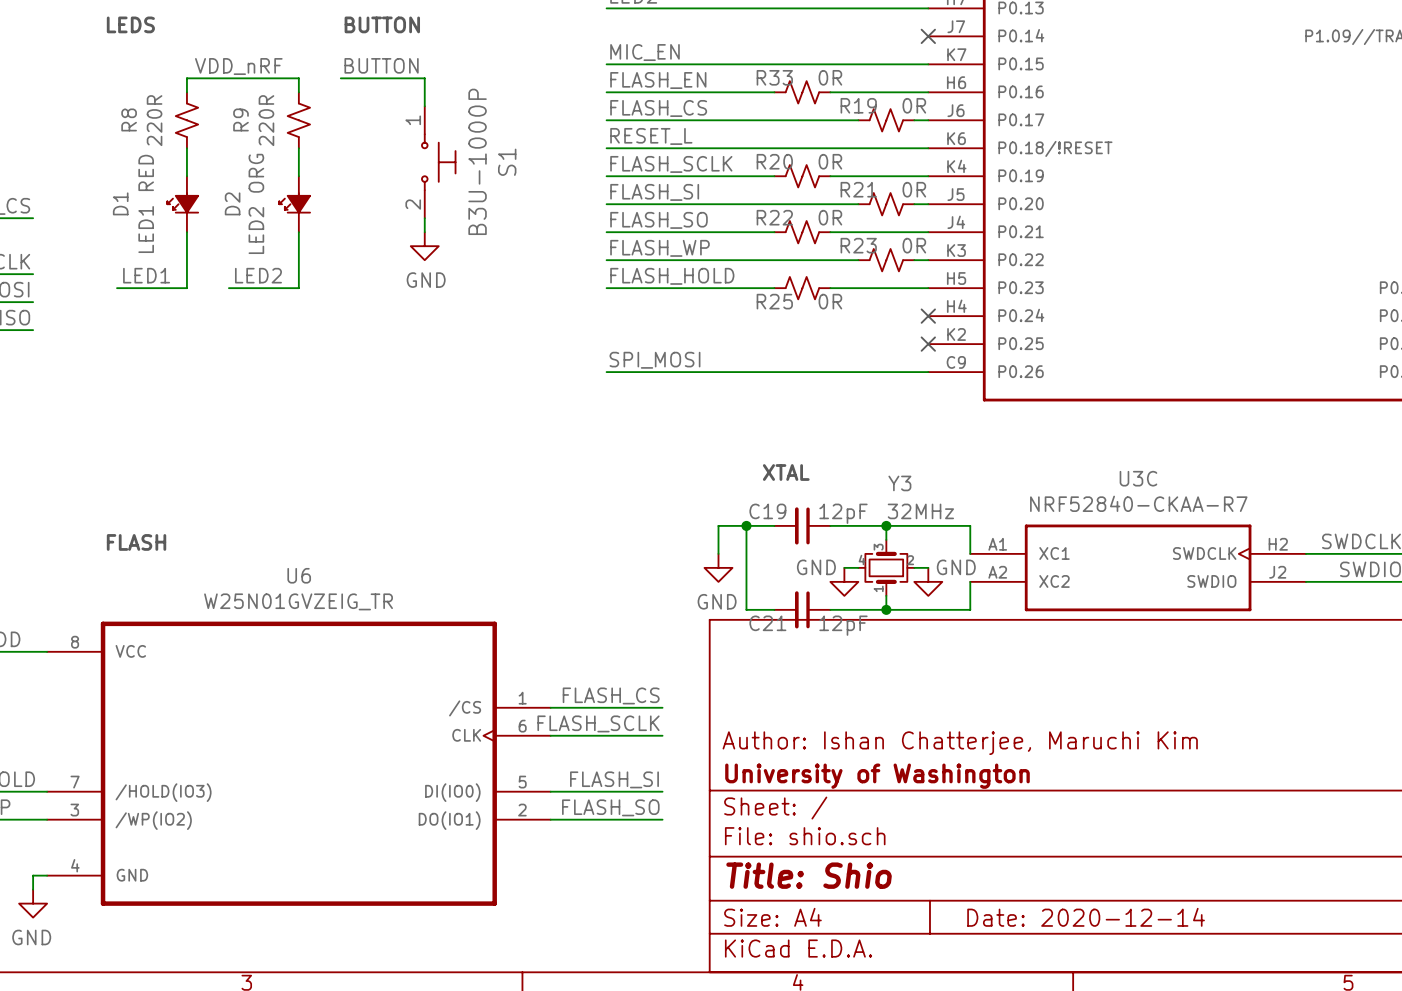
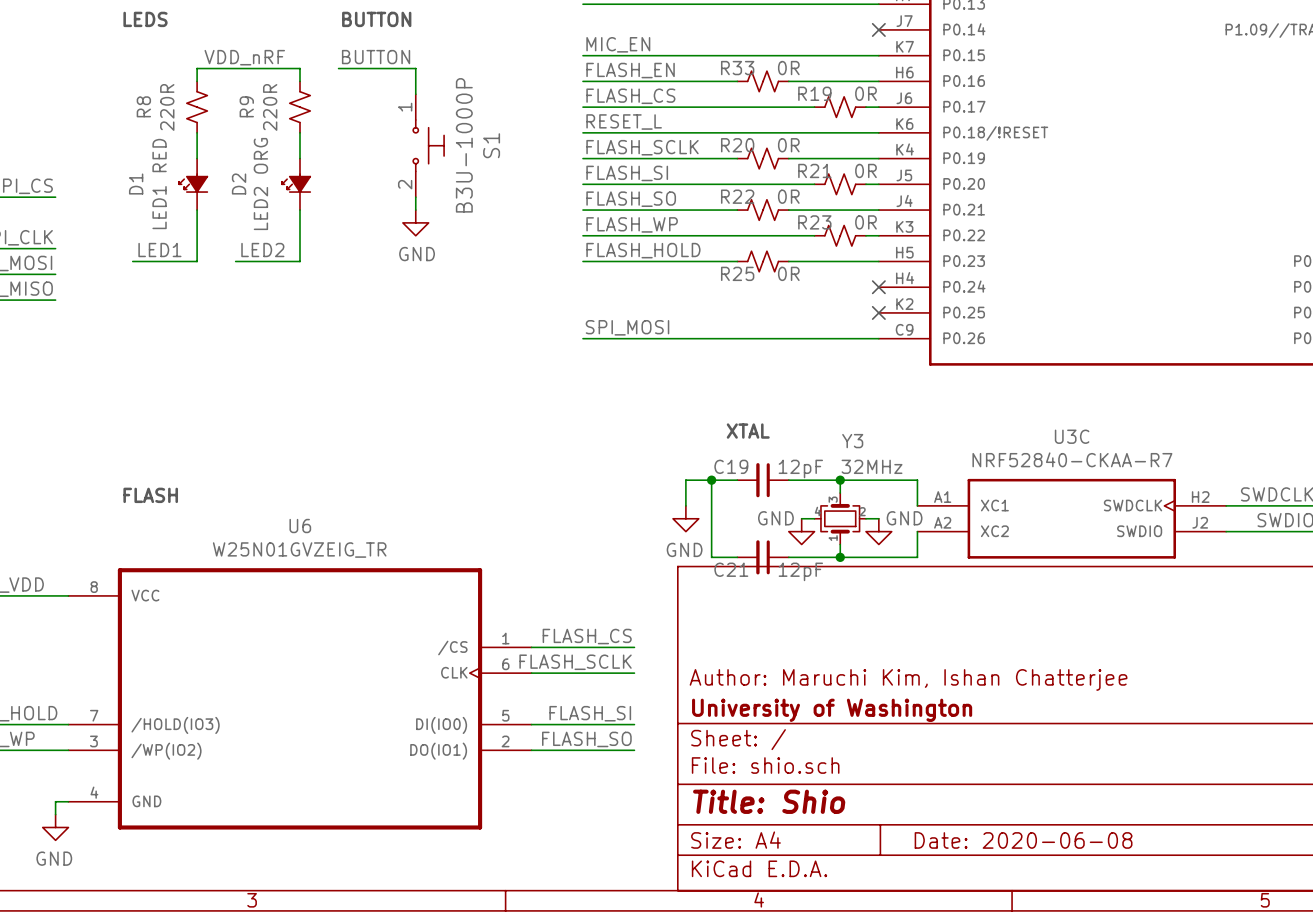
title block: Author: Ishan Chatterjee, Maruchi Kim (960, 743) -> Author: Maruchi Kim, Ishan Chatterjee (908, 679)
title block: Date: 2020-12-14 (1086, 917) -> Date: 2020-06-08 (1023, 840)

